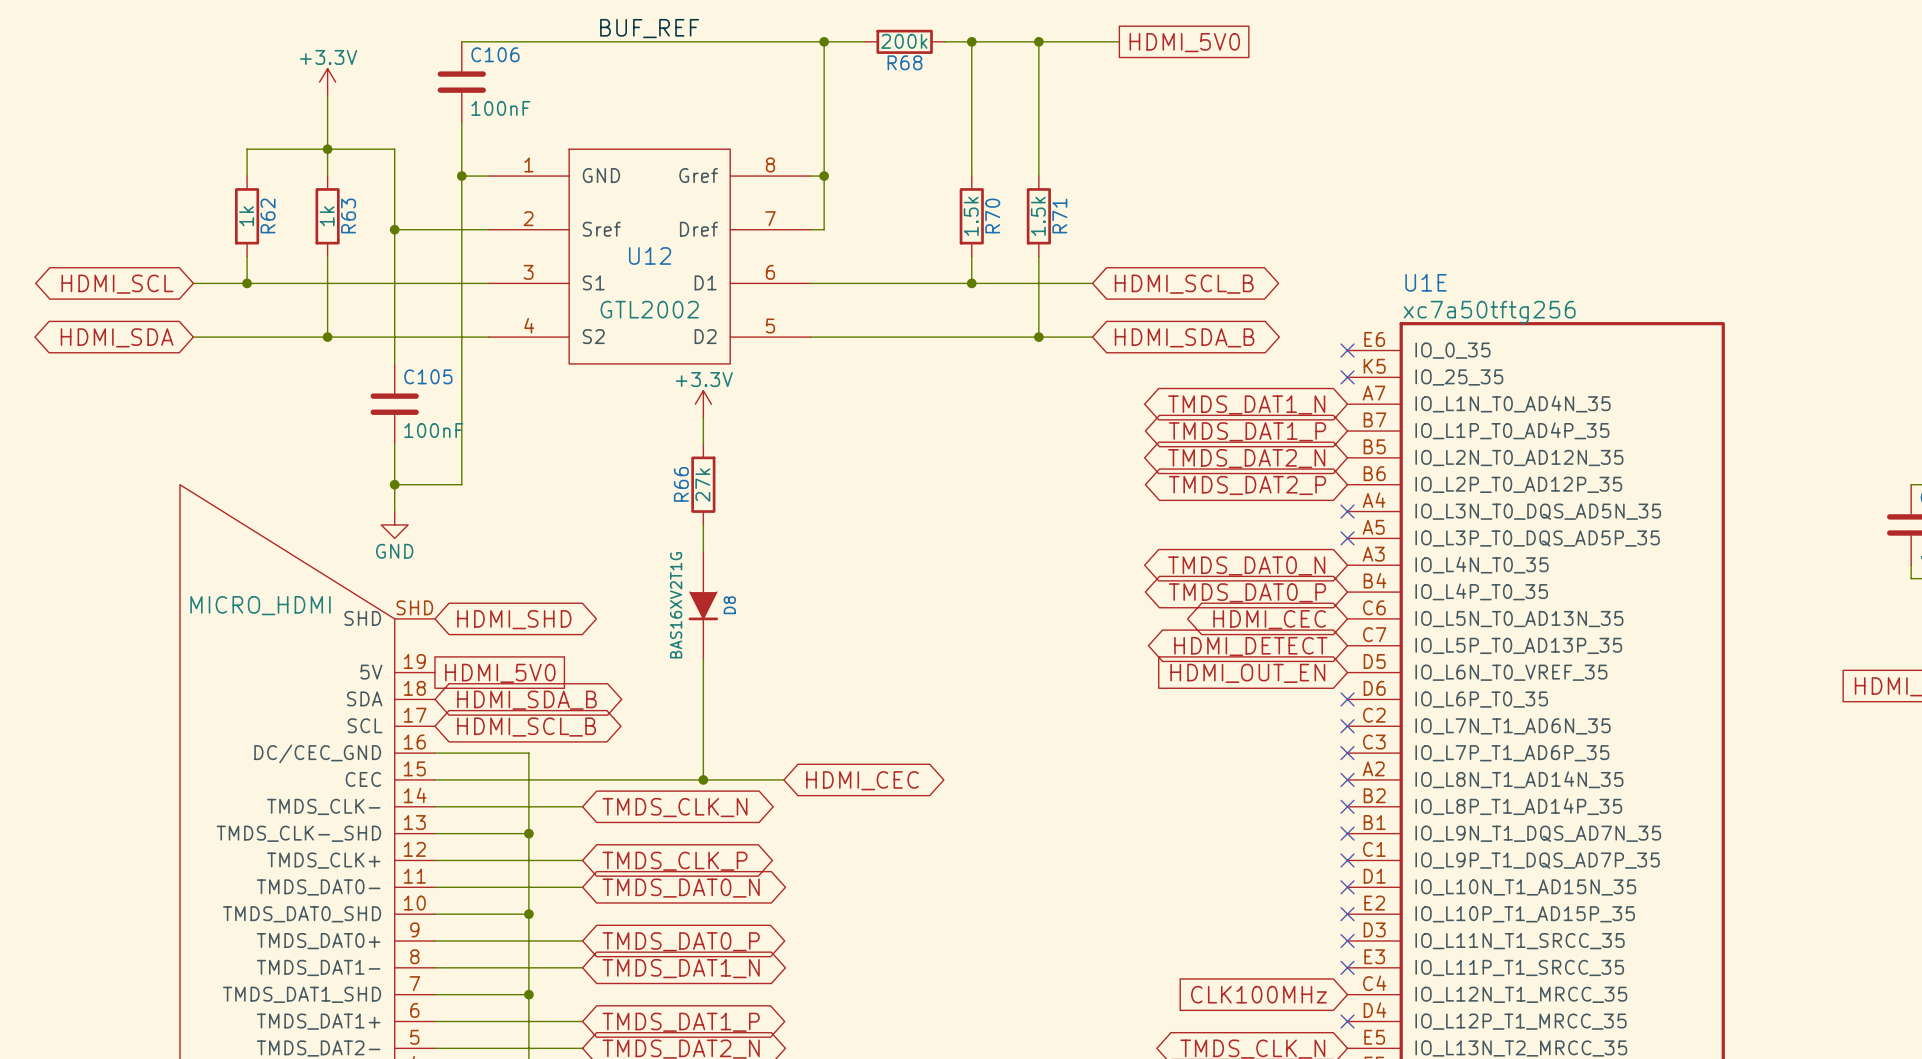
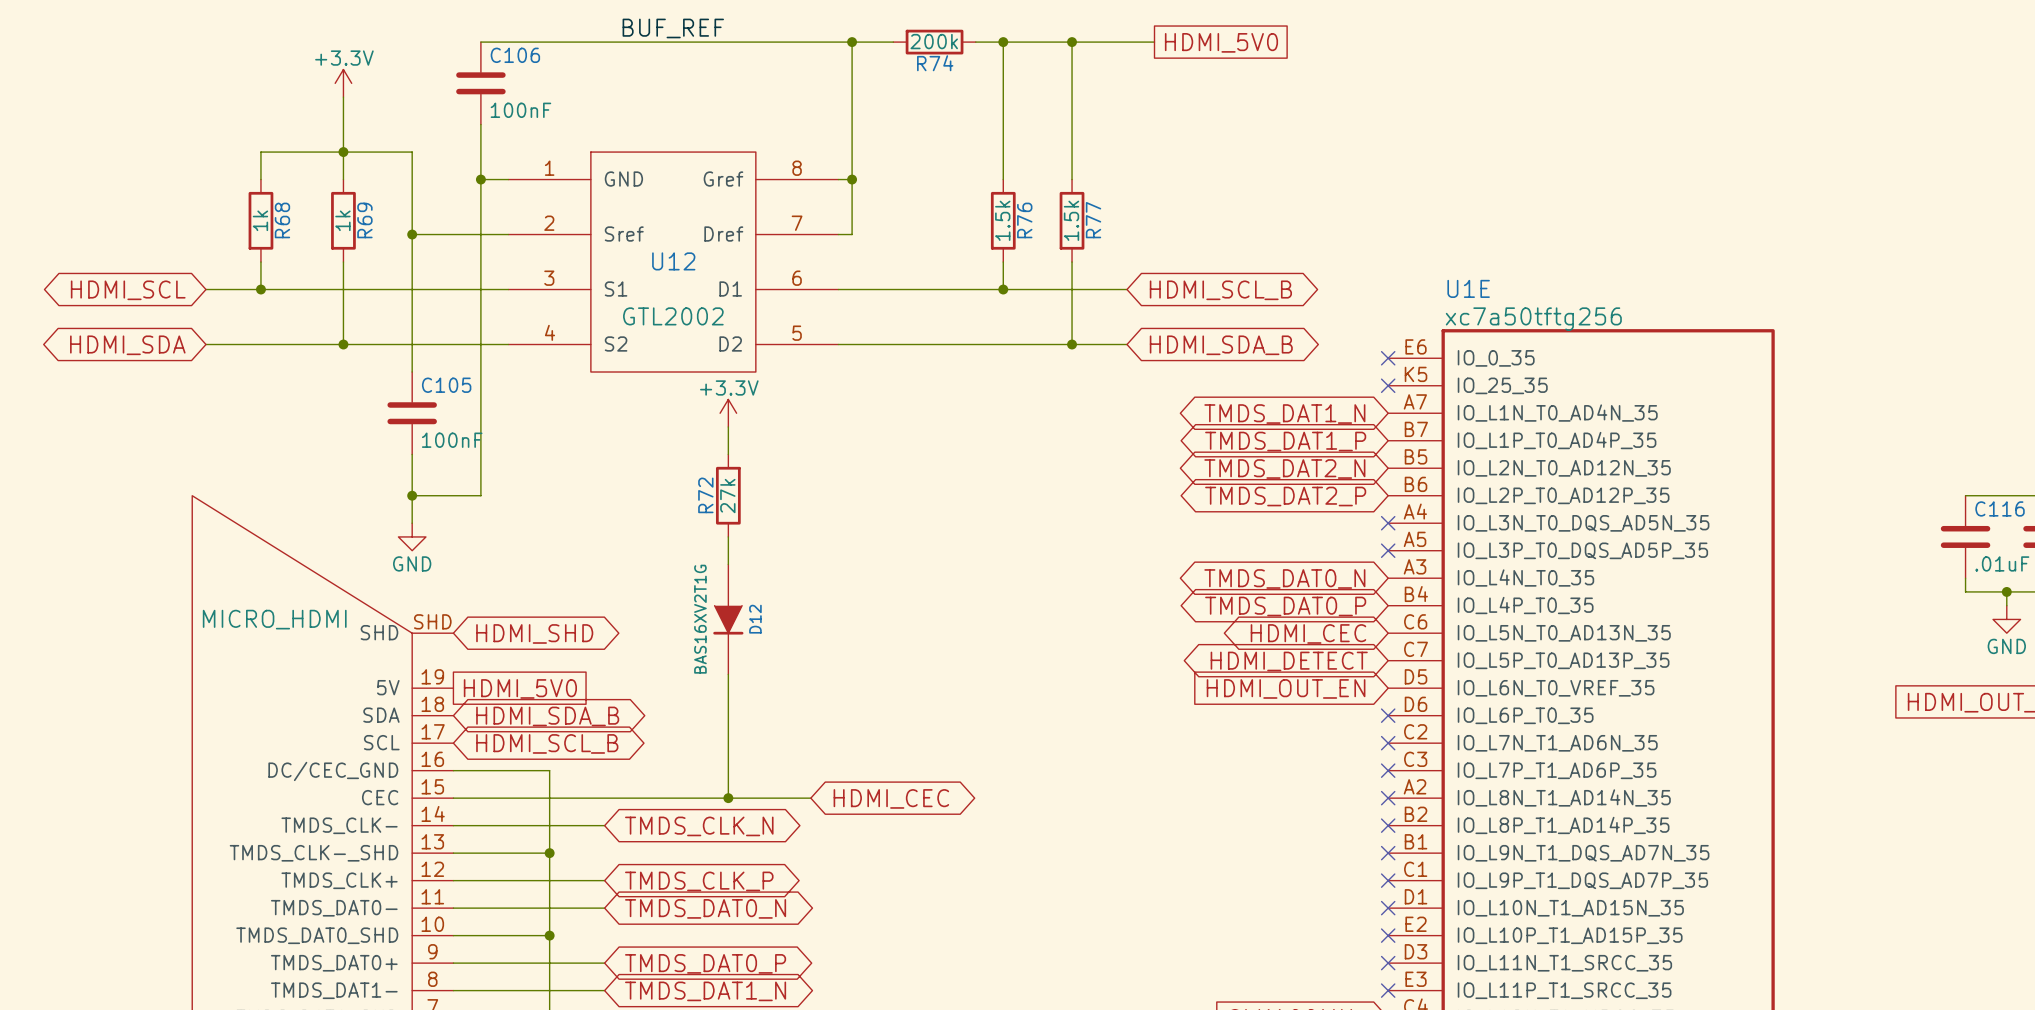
R68 name: R68 (904, 62) -> R74 (935, 63)
R62 name: R62 (268, 215) -> R68 (282, 220)
R63 name: R63 (348, 215) -> R69 (364, 220)
R70 name: R70 (992, 215) -> R76 (1024, 220)
R71 name: R71 (1059, 215) -> R77 (1093, 220)
R66 name: R66 (681, 484) -> R72 (705, 495)
D8 name: D8 (729, 605) -> D12 (755, 619)

